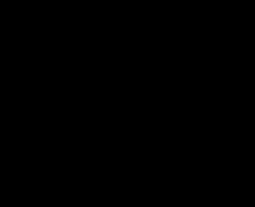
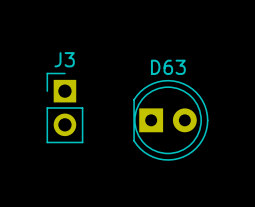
J3: none -> (64, 107)
D63: none -> (170, 120)

